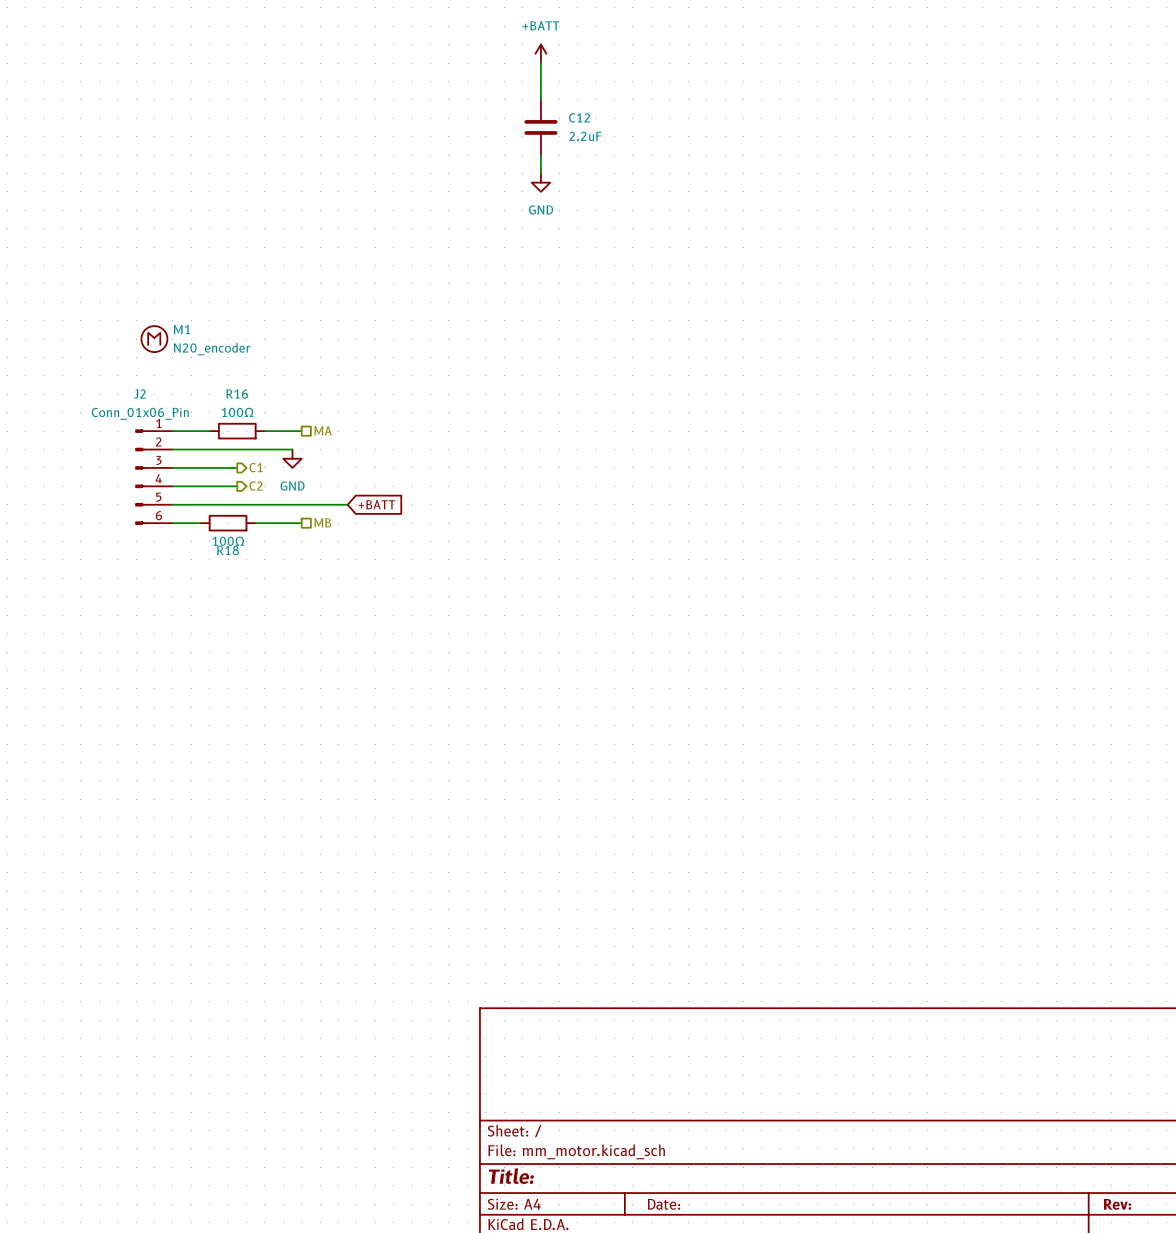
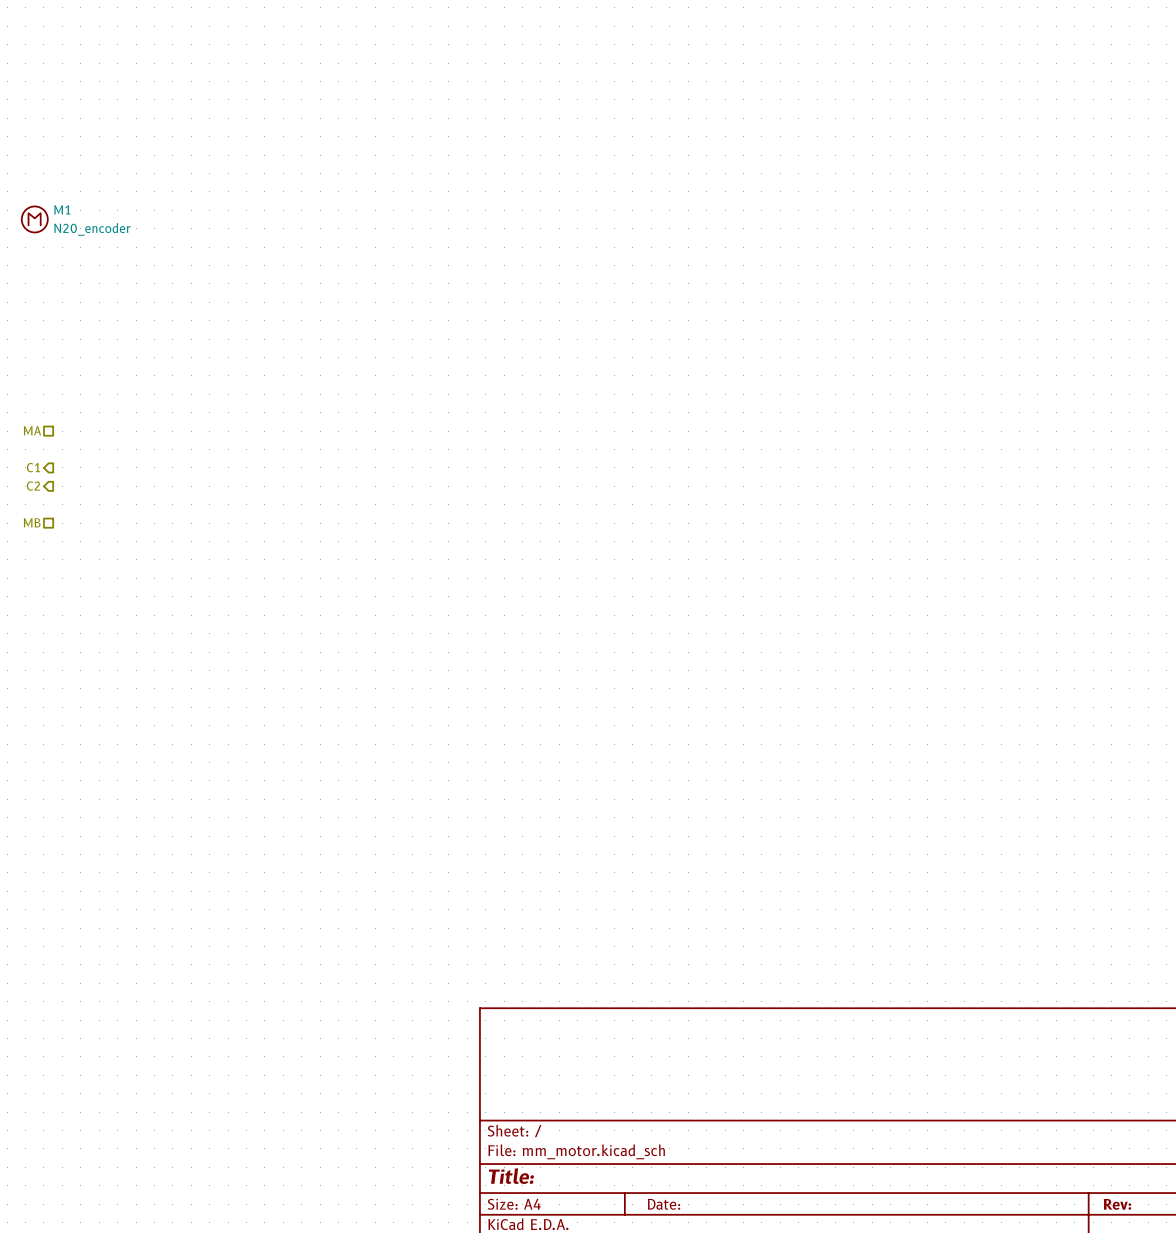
power symbol: +BATT (540, 53) -> none
wire: (540, 63) (540, 99) -> none
C12: 2.2uF (540, 127) -> none
wire: (540, 155) (540, 173) -> none
power symbol: GND (540, 182) -> none
M1 position: (154, 339) -> (34, 219)
hierarchical label: none -> MA (32, 430)
hierarchical label: MA (323, 430) -> none
wire: (172, 431) (209, 431) -> none
R16: 100Ω (237, 431) -> none
wire: (264, 431) (301, 431) -> none
wire: (172, 449) (292, 449) -> none
power symbol: GND (292, 458) -> none
hierarchical label: none -> C1 (33, 467)
wire: (172, 467) (237, 467) -> none
hierarchical label: C1 (256, 467) -> none
J2: Conn_01x06_Pin (154, 477) -> none
hierarchical label: none -> C2 (33, 486)
wire: (172, 486) (237, 486) -> none
hierarchical label: C2 (256, 486) -> none
wire: (172, 504) (347, 504) -> none
global label: +BATT (376, 504) -> none
hierarchical label: none -> MB (32, 522)
hierarchical label: MB (322, 522) -> none
wire: (172, 523) (200, 523) -> none
R18: 100Ω (228, 523) -> none
wire: (255, 523) (301, 523) -> none

